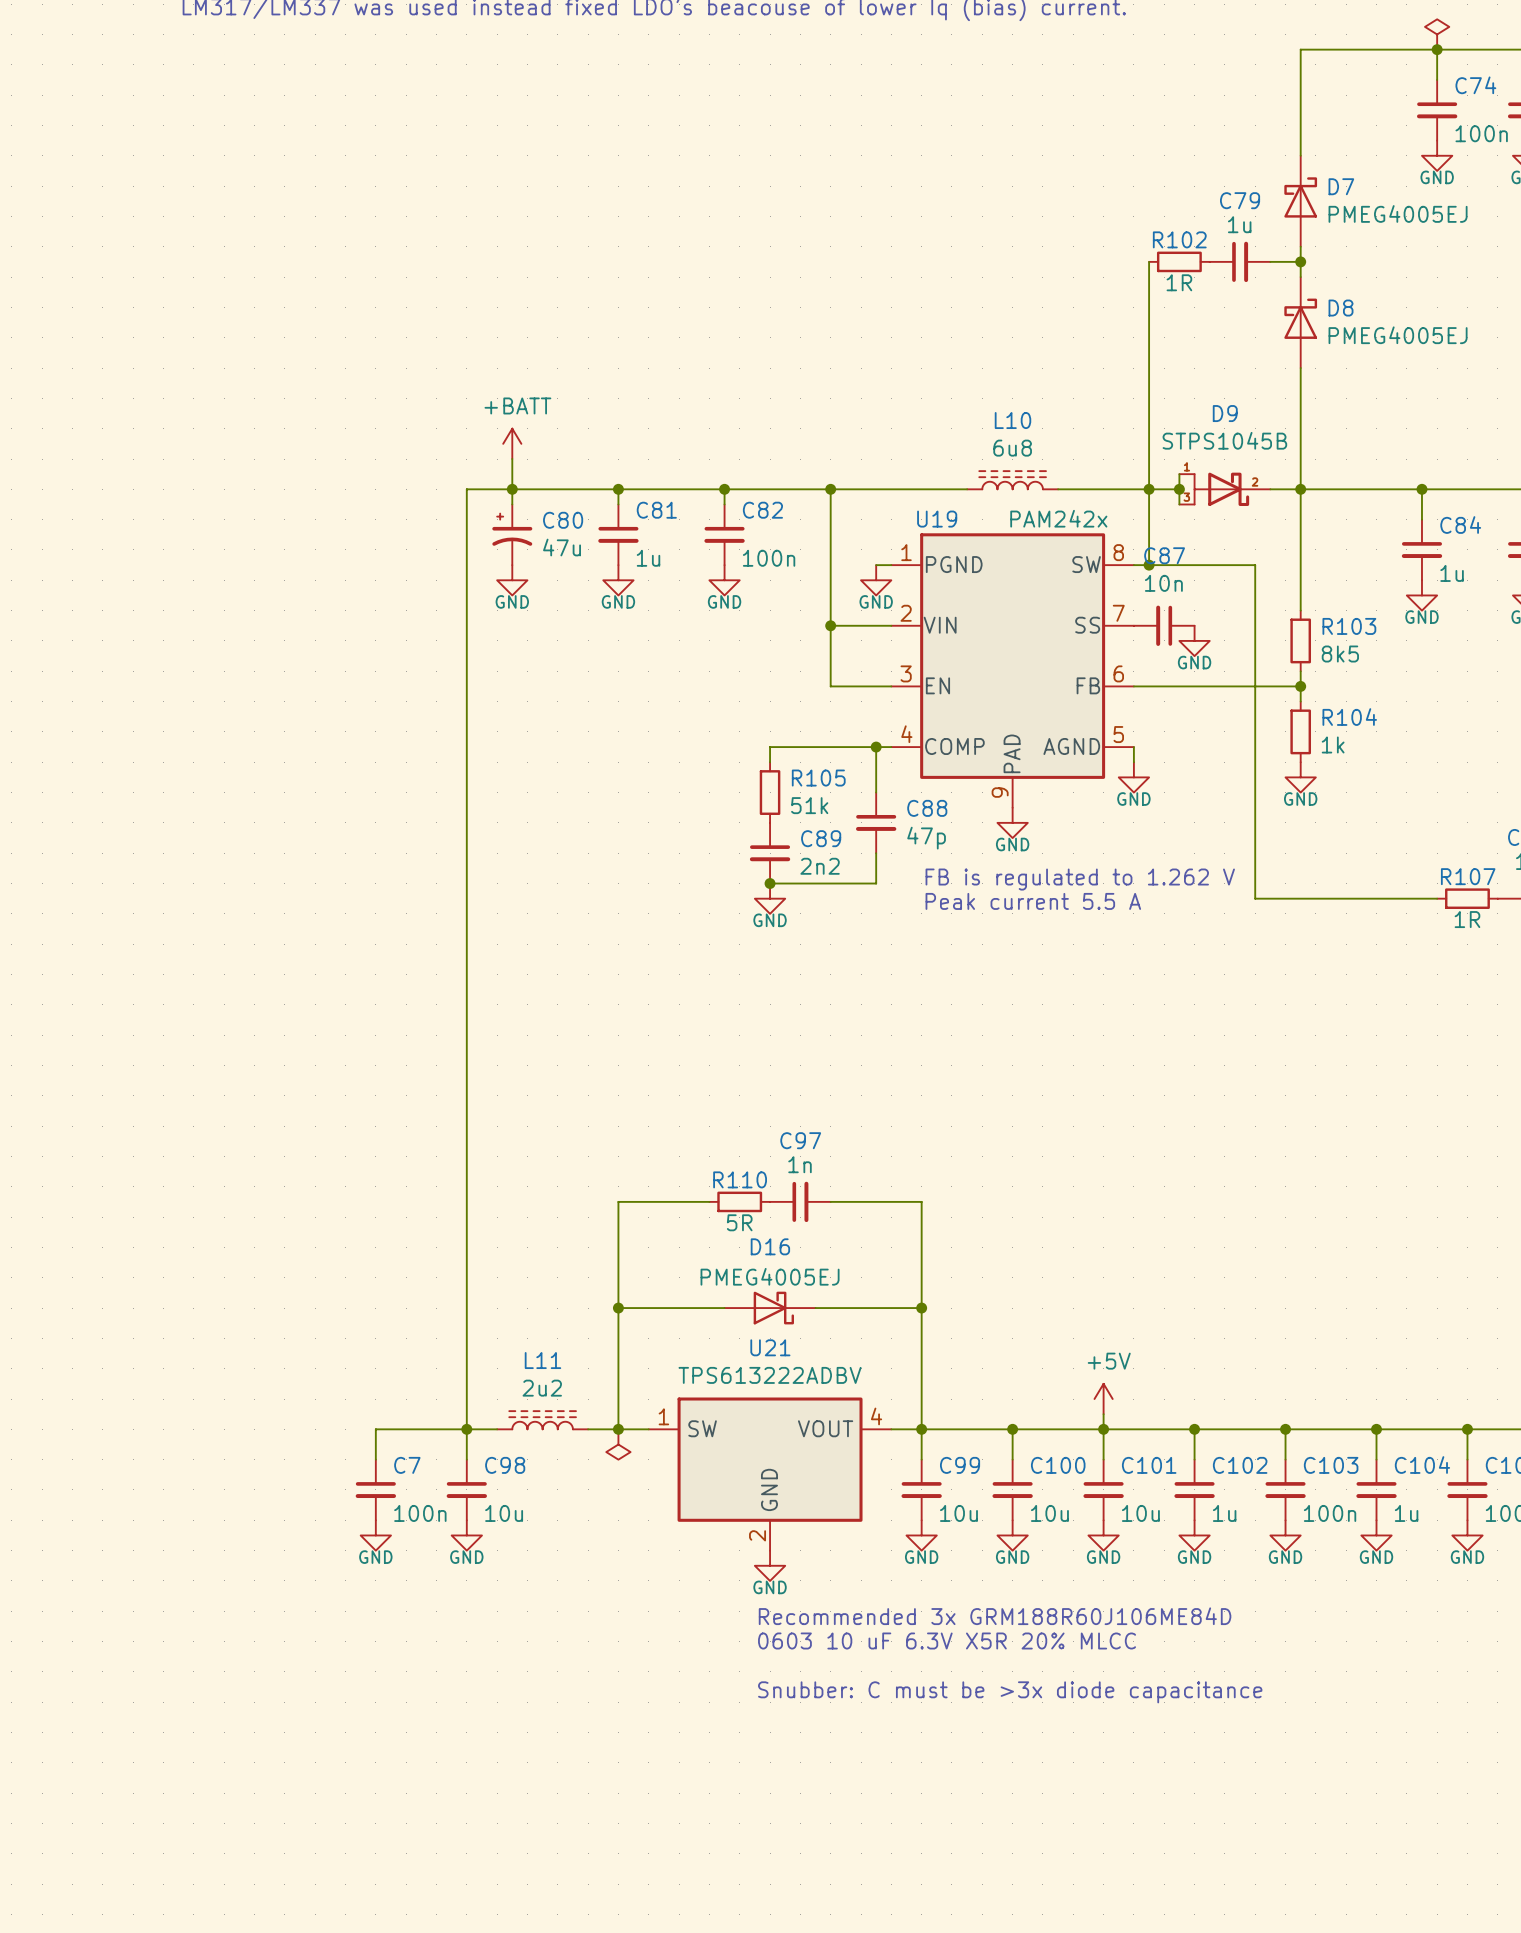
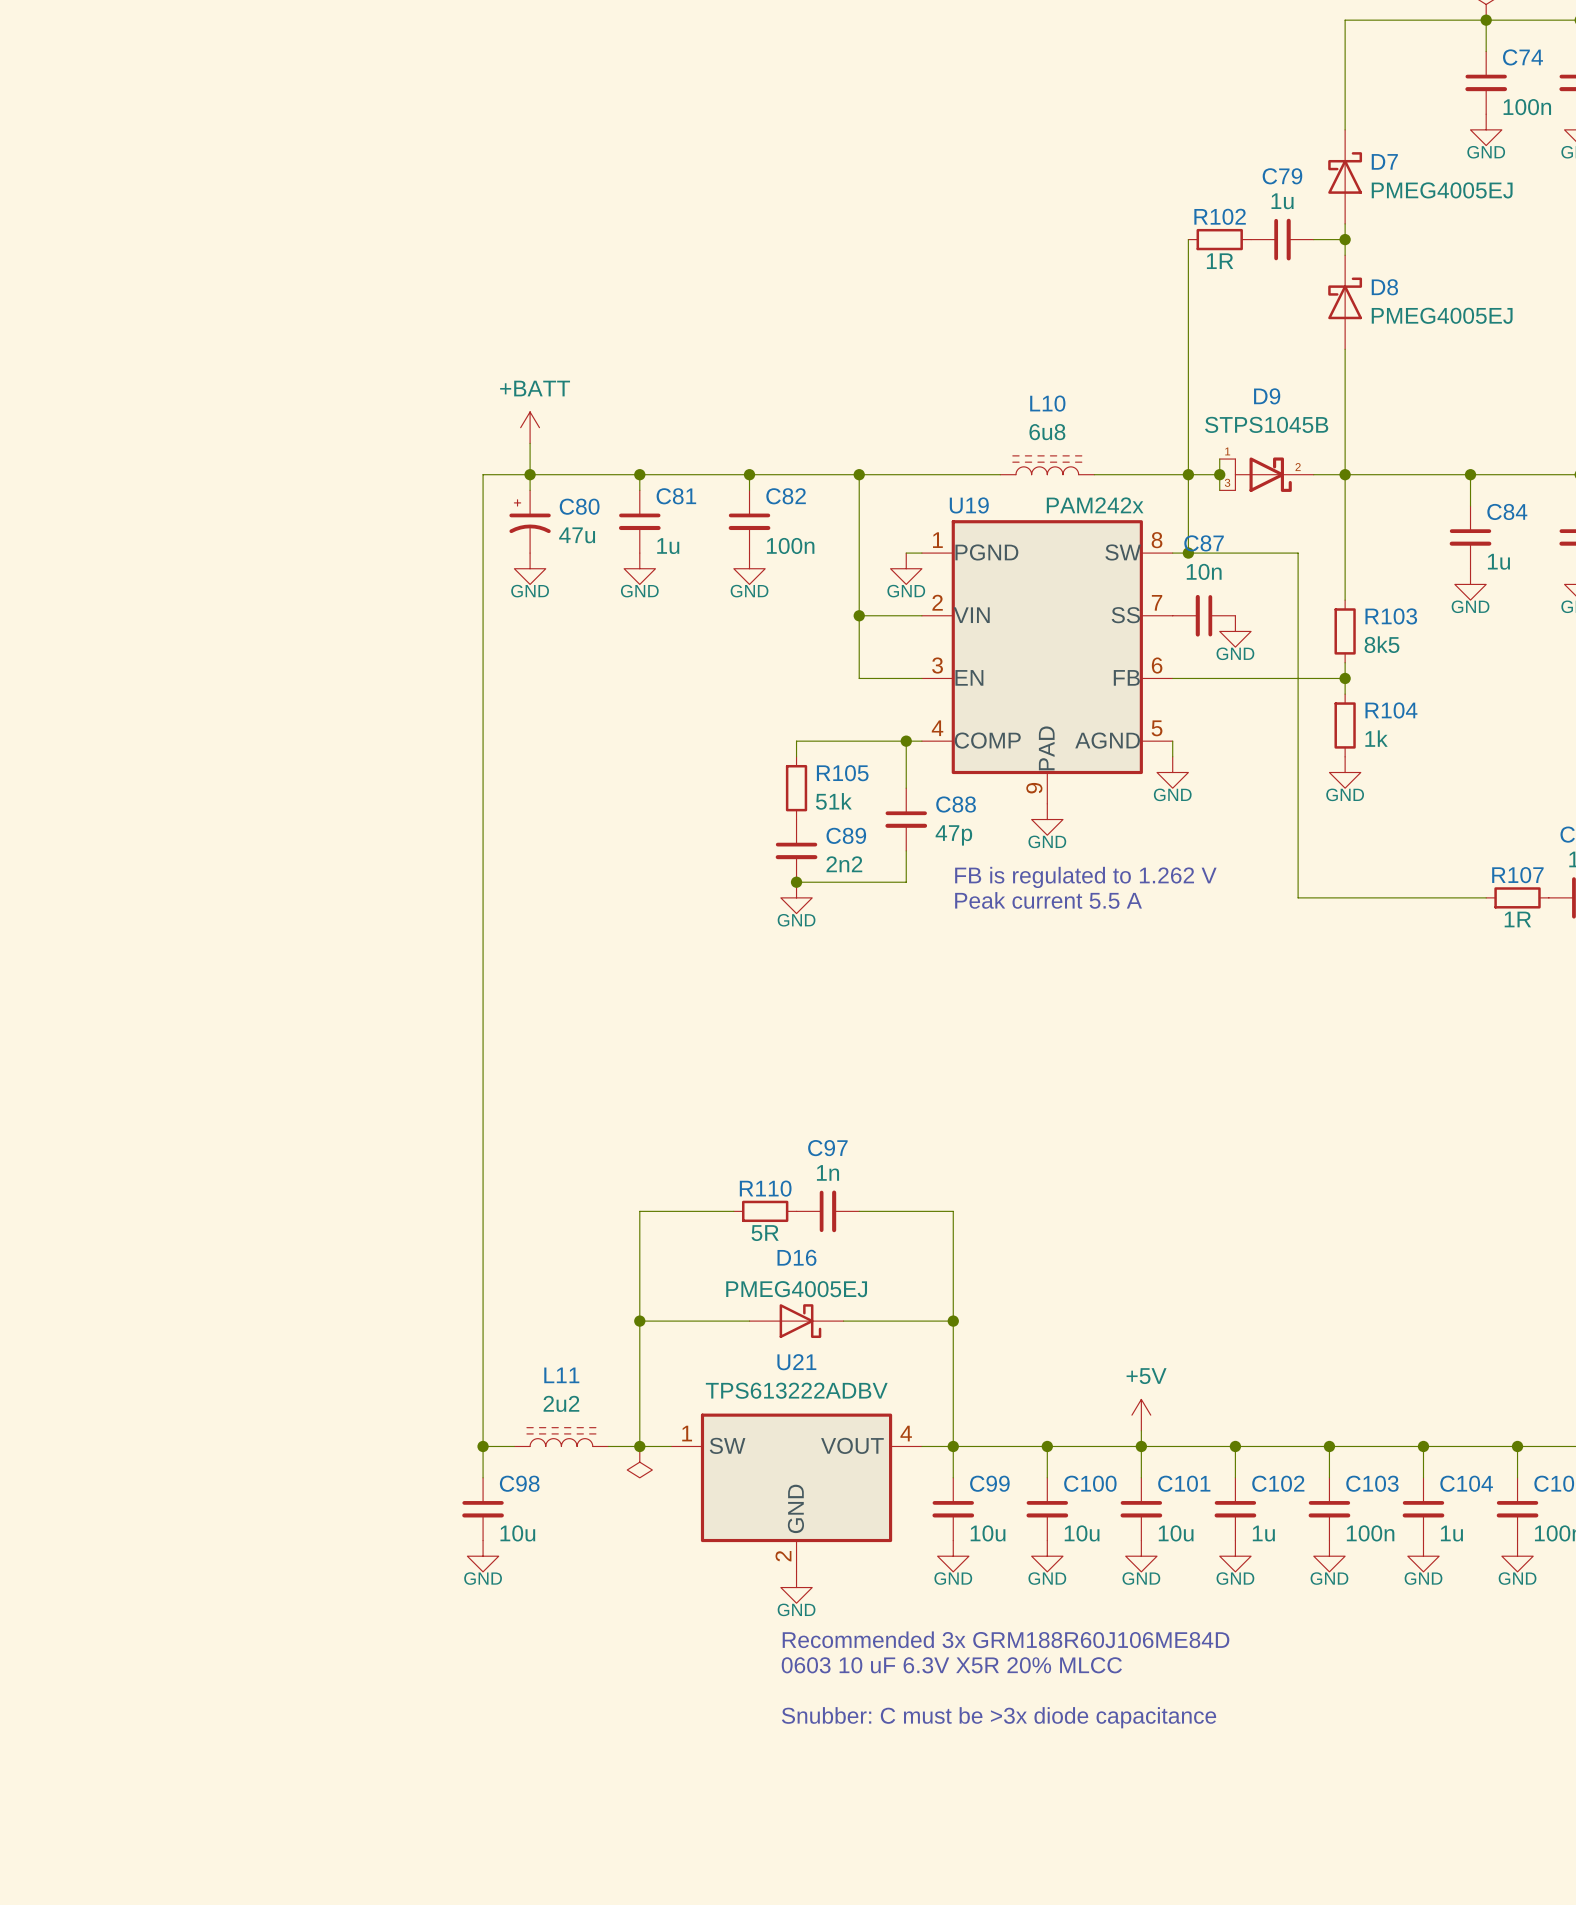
wire: (466, 1429) (375, 1429) (375, 1459) -> none
C7: 100n (375, 1489) -> none
power symbol: GND (375, 1535) -> none

